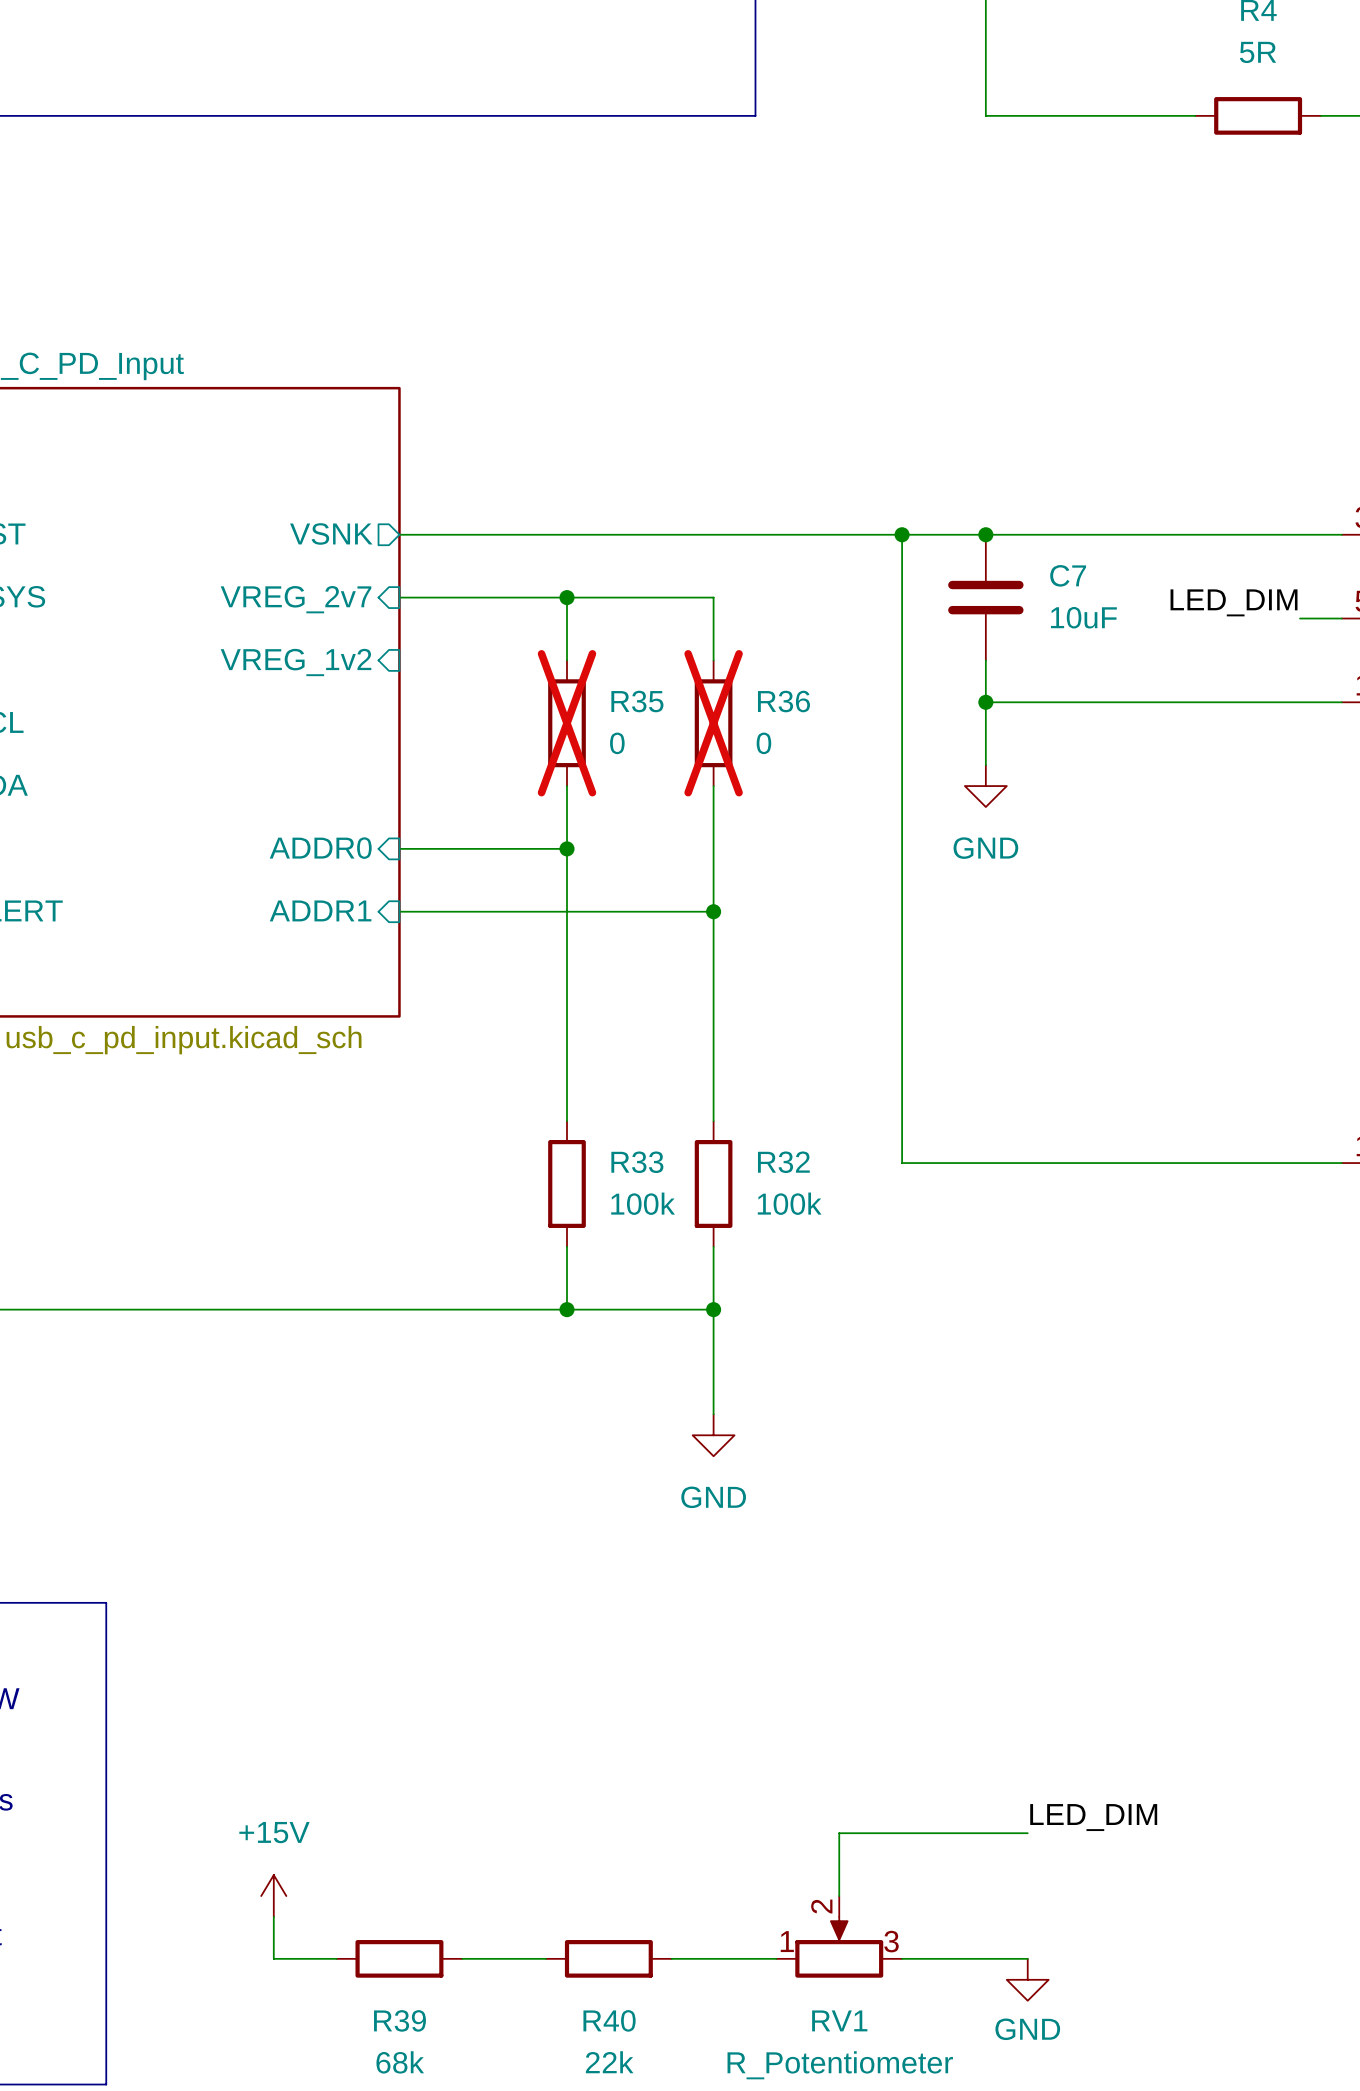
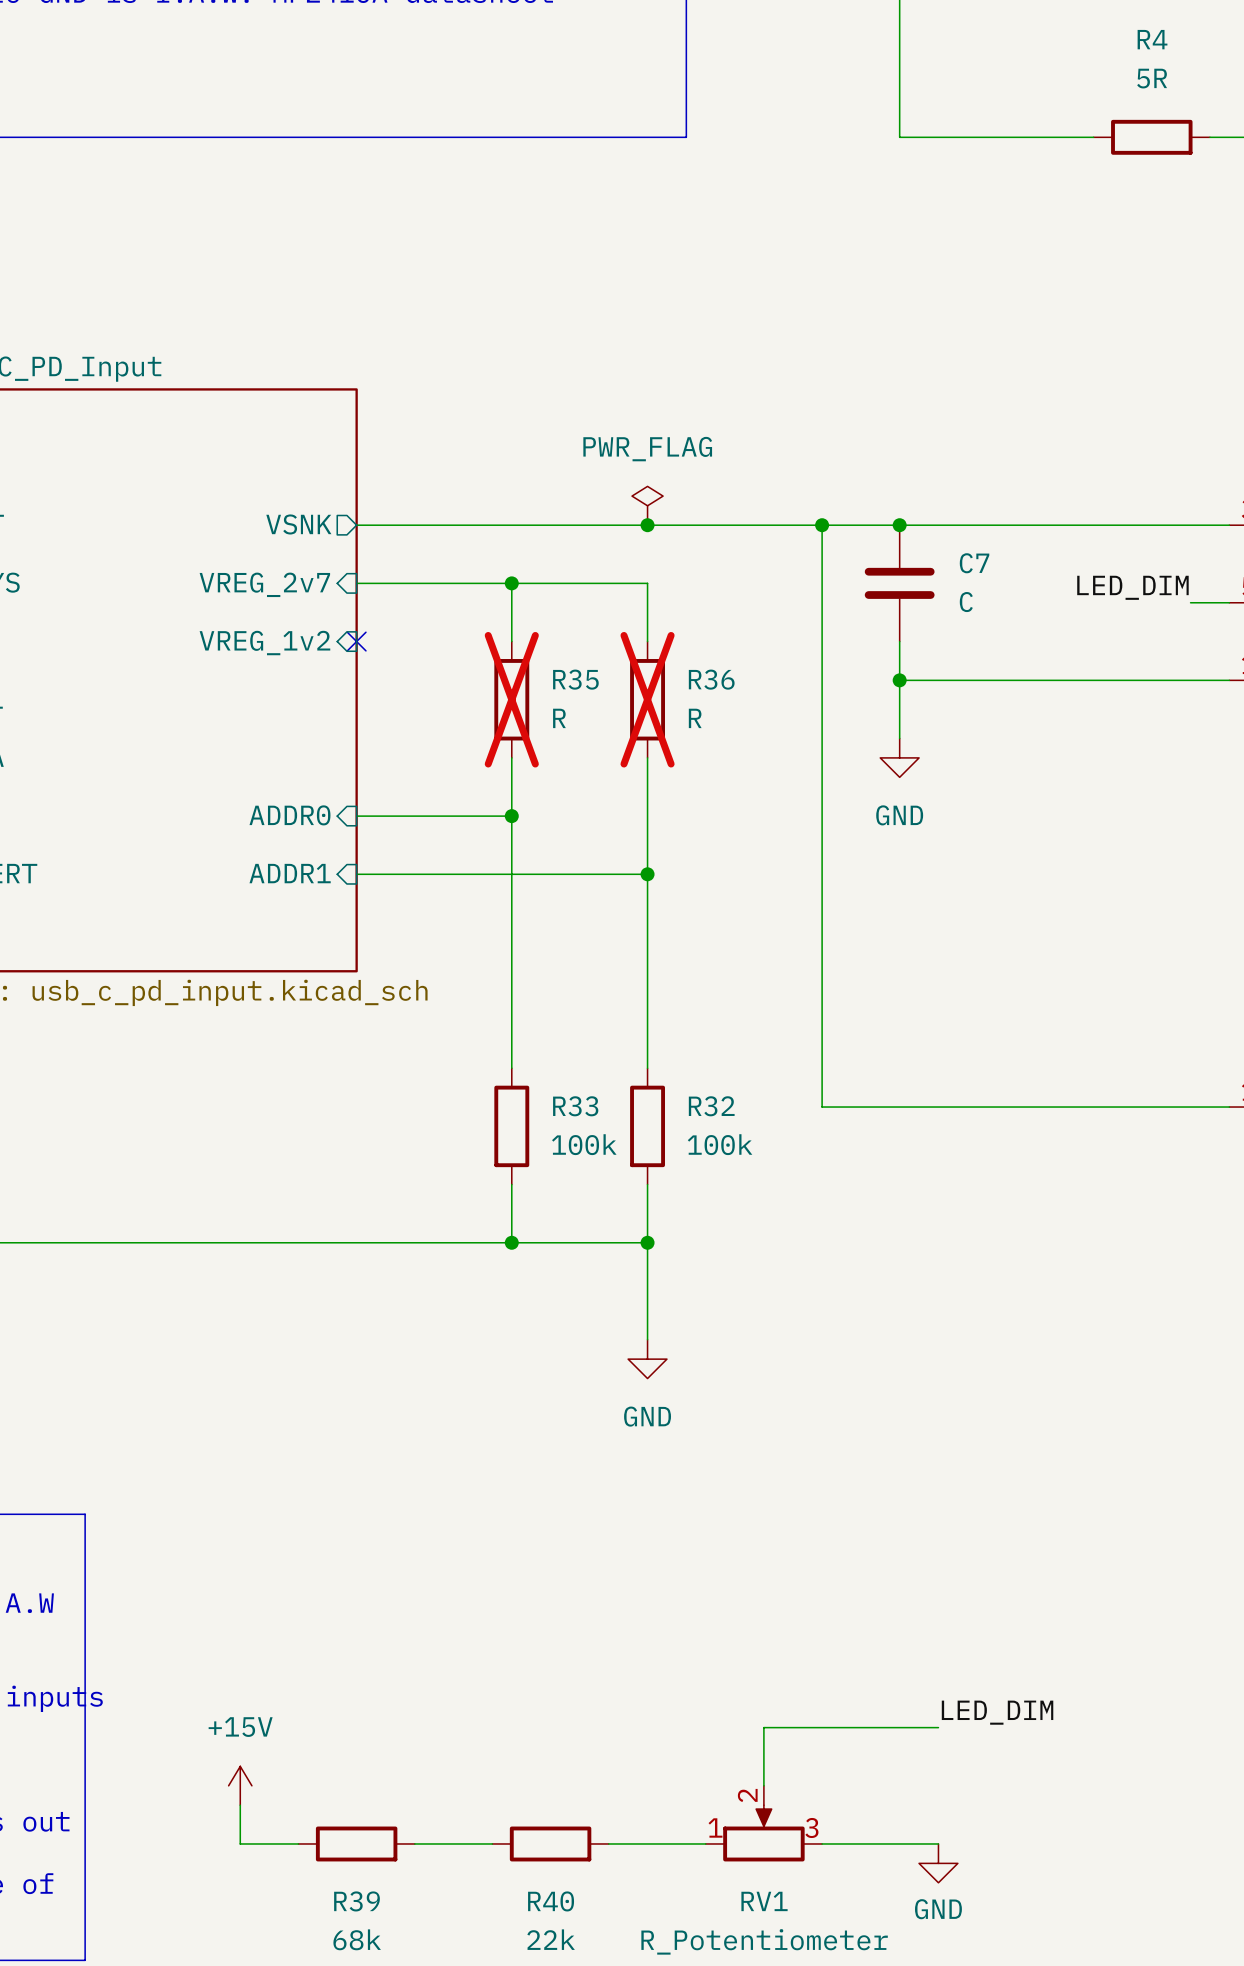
power symbol: none -> PWR_FLAG (647, 505)
junction: none -> (647, 525)
C7 value: 10uF (1083, 617) -> C (966, 602)
no-connect mark: none -> (356, 641)
R35 value: 0 (617, 743) -> R (559, 718)
R36 value: 0 (763, 743) -> R (695, 718)

